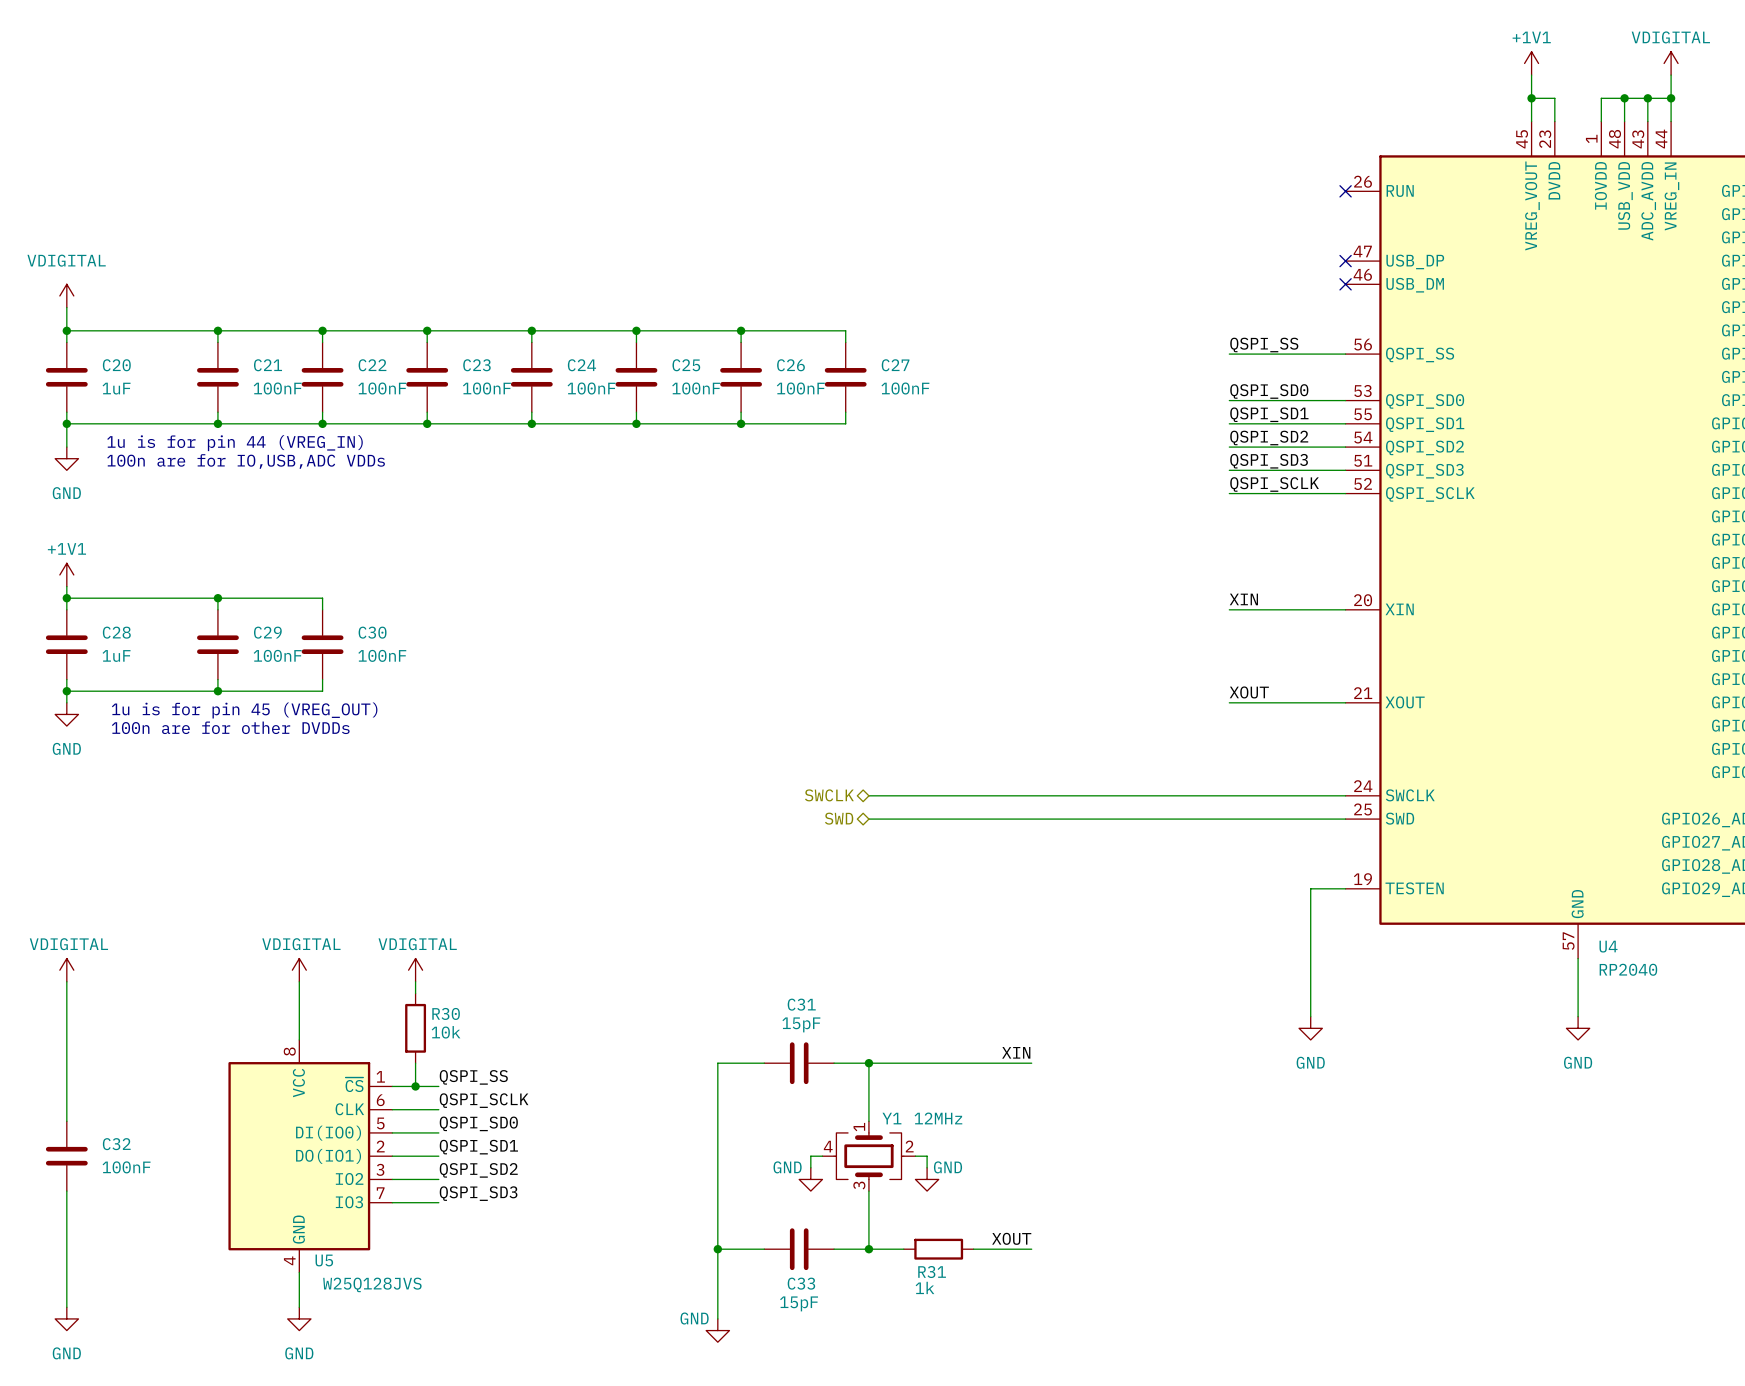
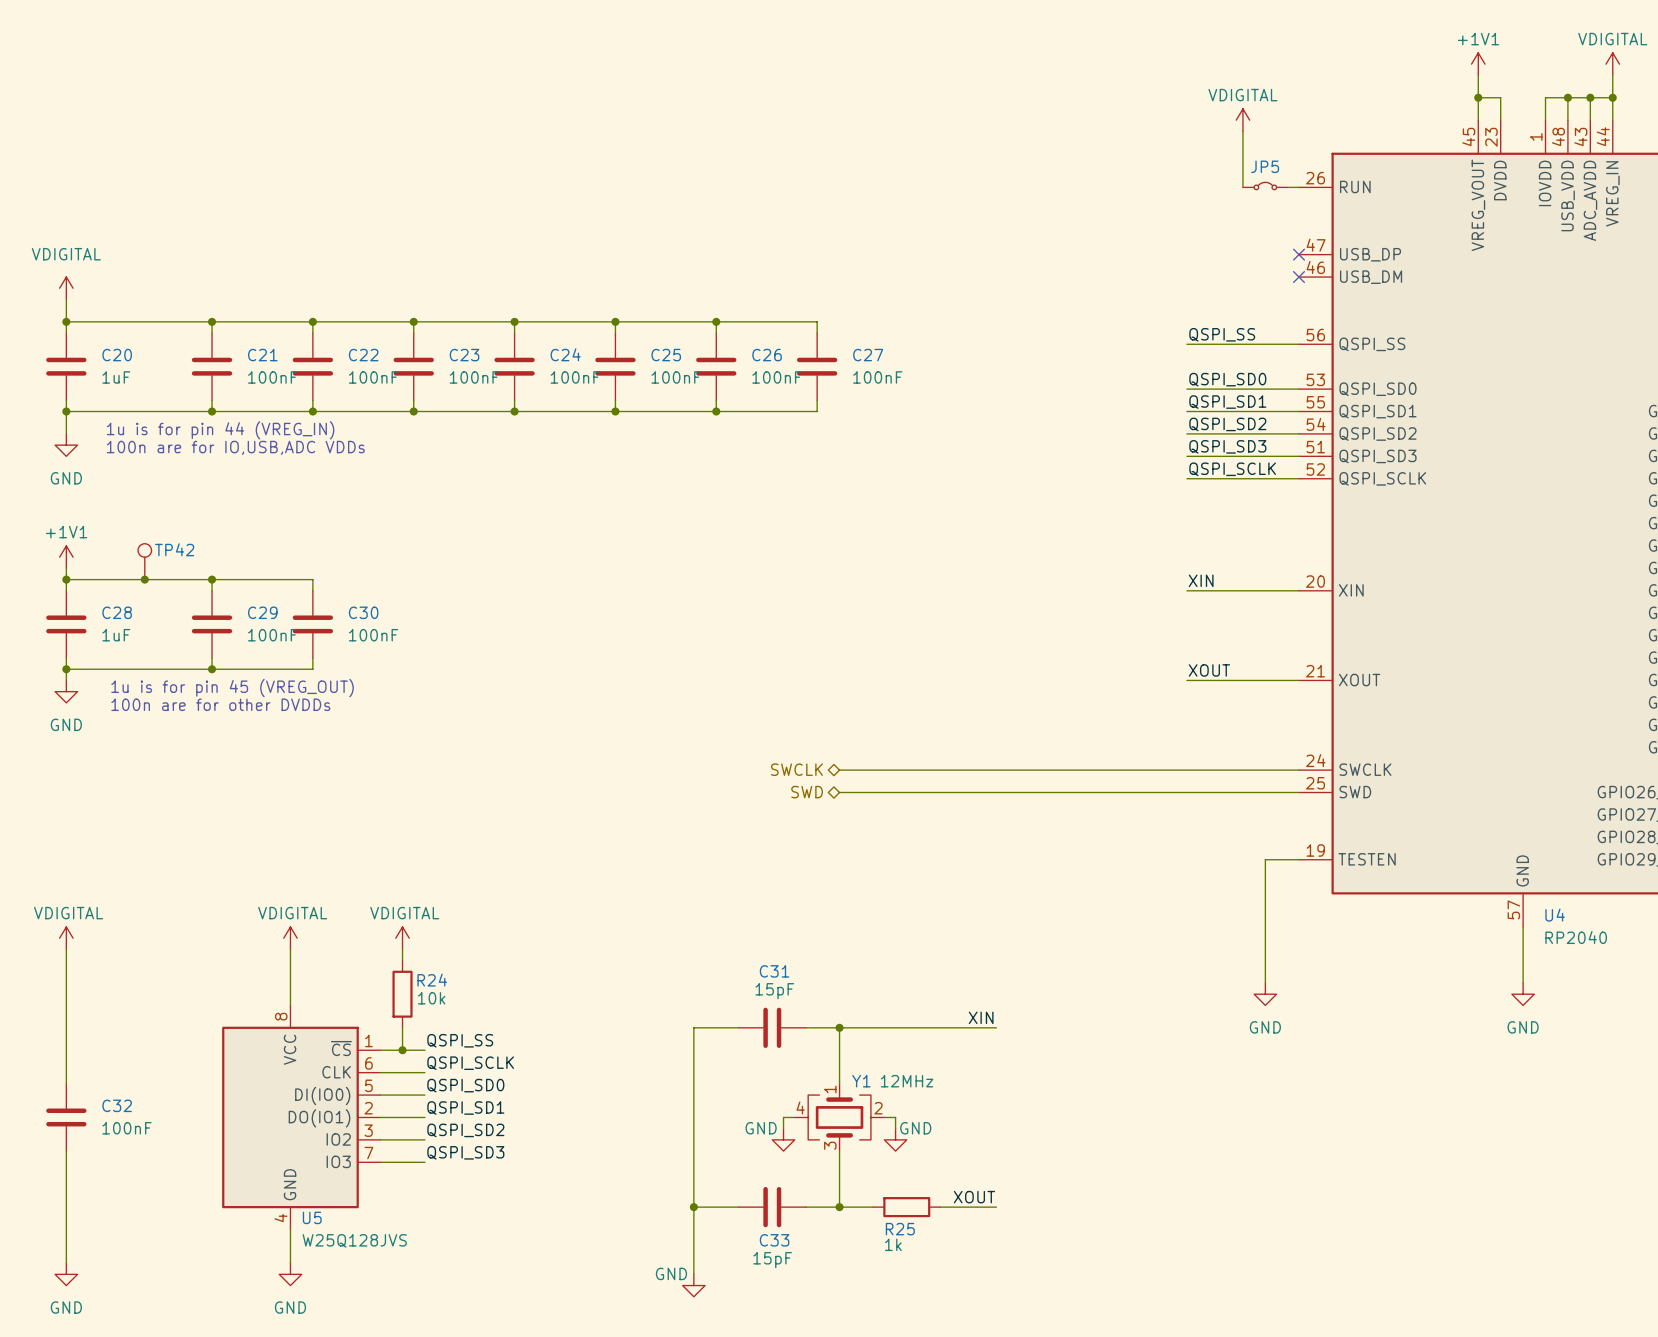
power symbol: none -> VDIGITAL (1242, 120)
wire: none -> (1242, 131) (1242, 187)
JP5: none -> (1265, 186)
wire: none -> (1287, 187) (1298, 187)
no-connect mark: (1345, 191) -> none
TP42: none -> (144, 561)
junction: none -> (144, 579)
R30 name: R30 (446, 1013) -> R24 (432, 980)
R31 name: R31 (932, 1272) -> R25 (900, 1229)

